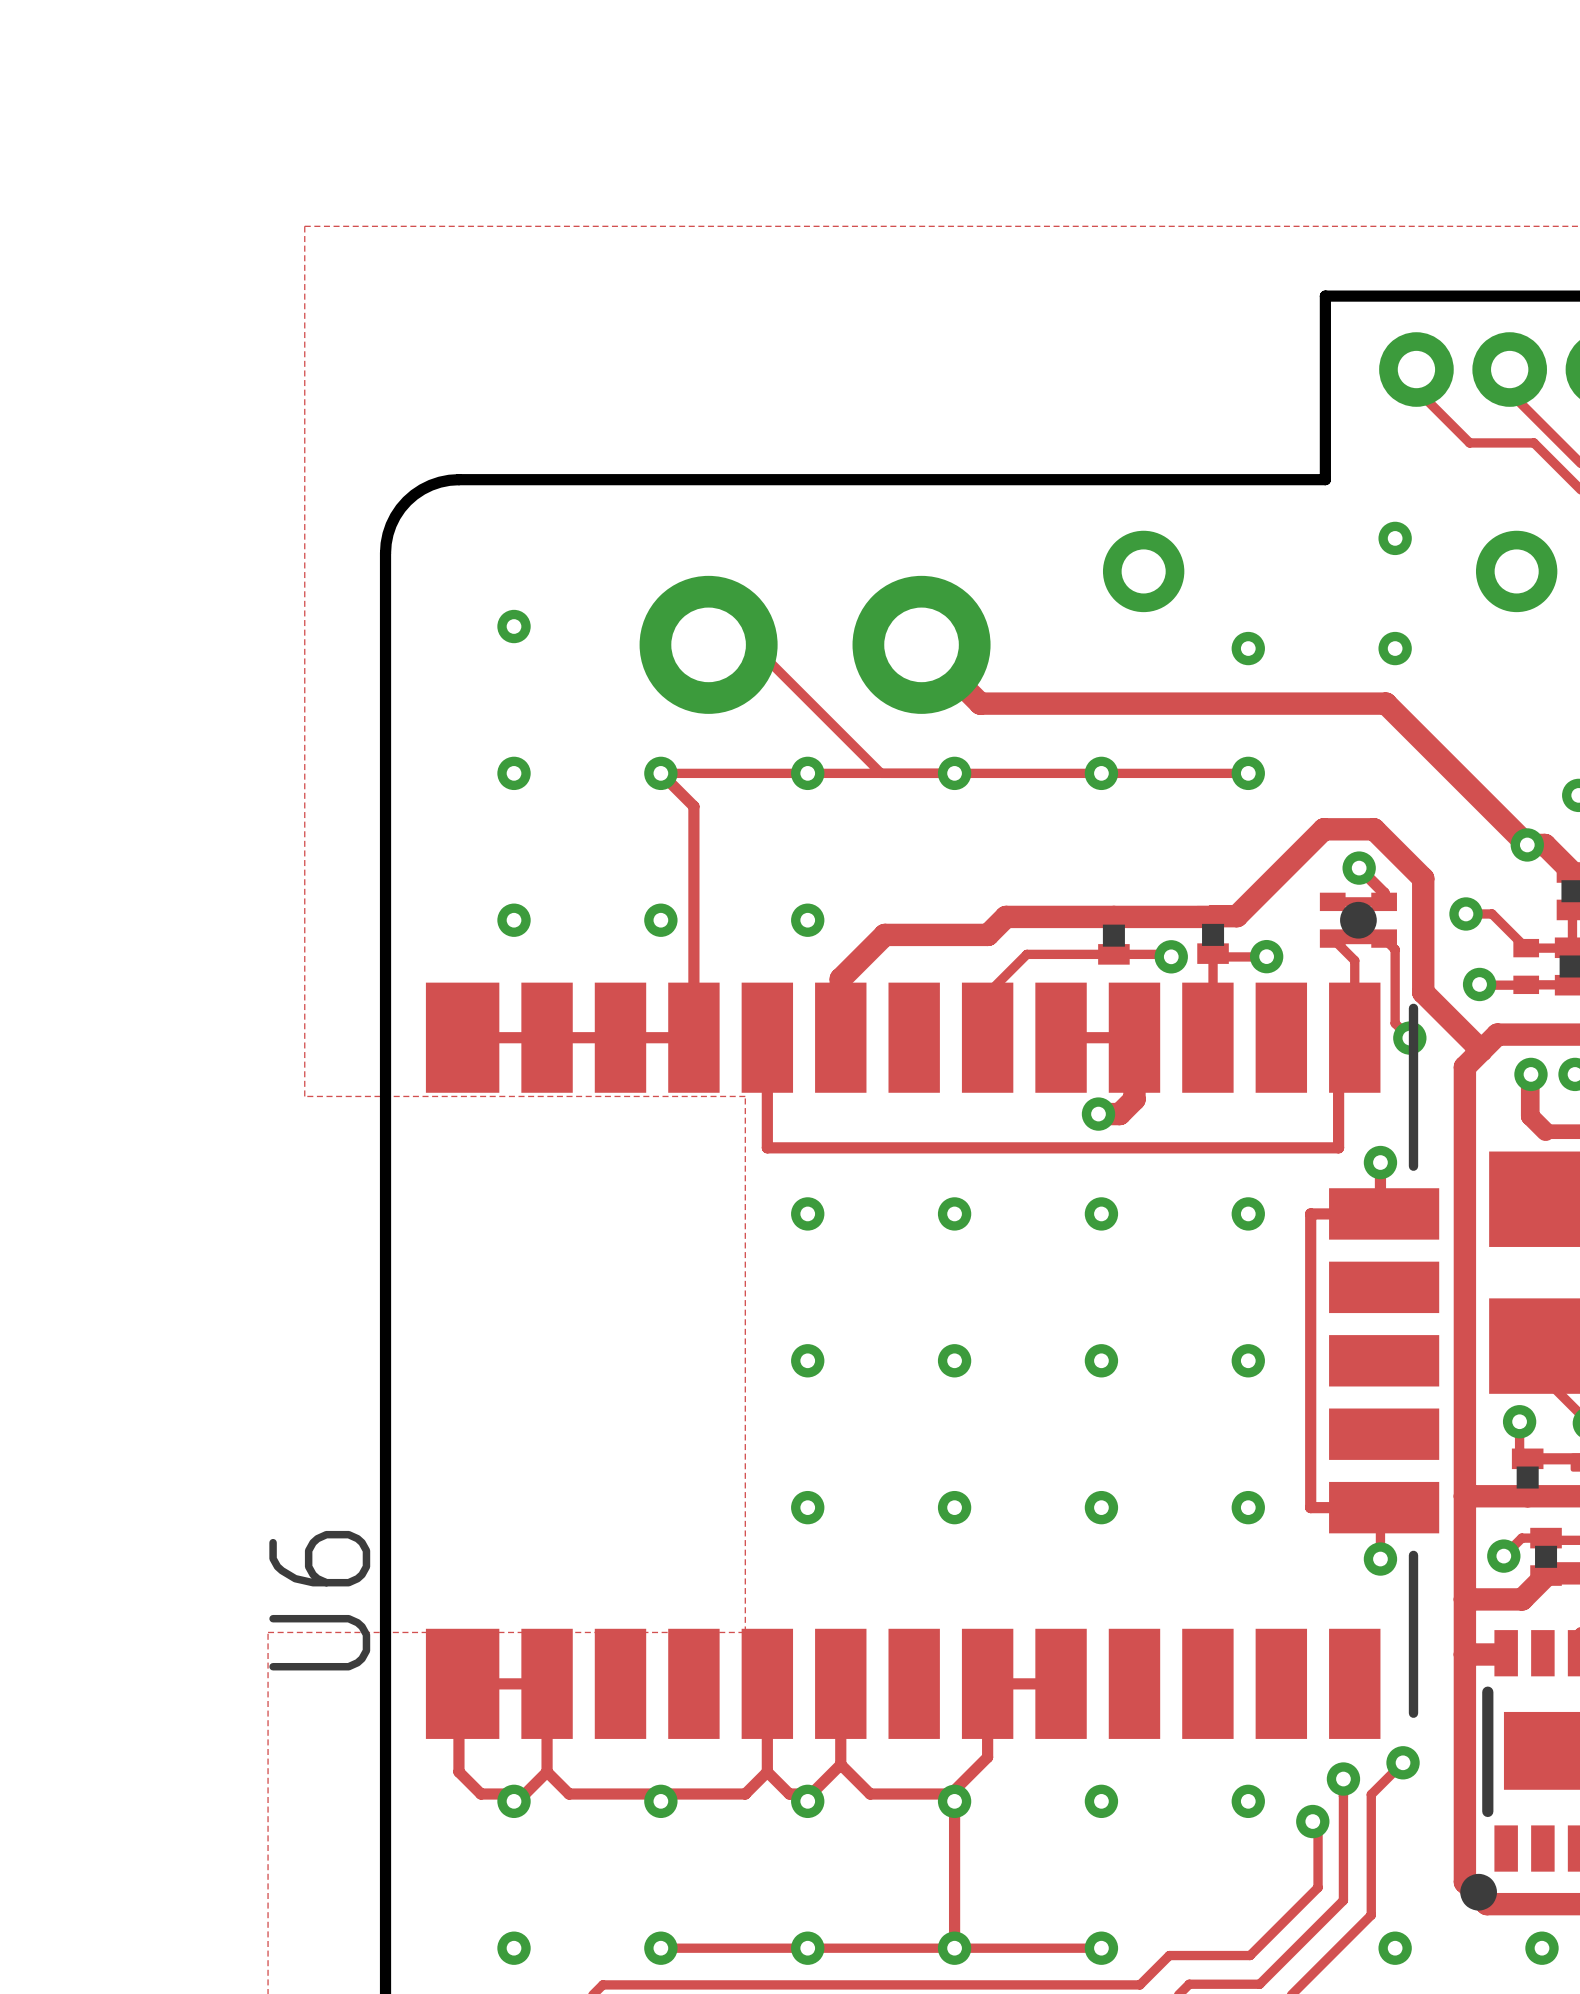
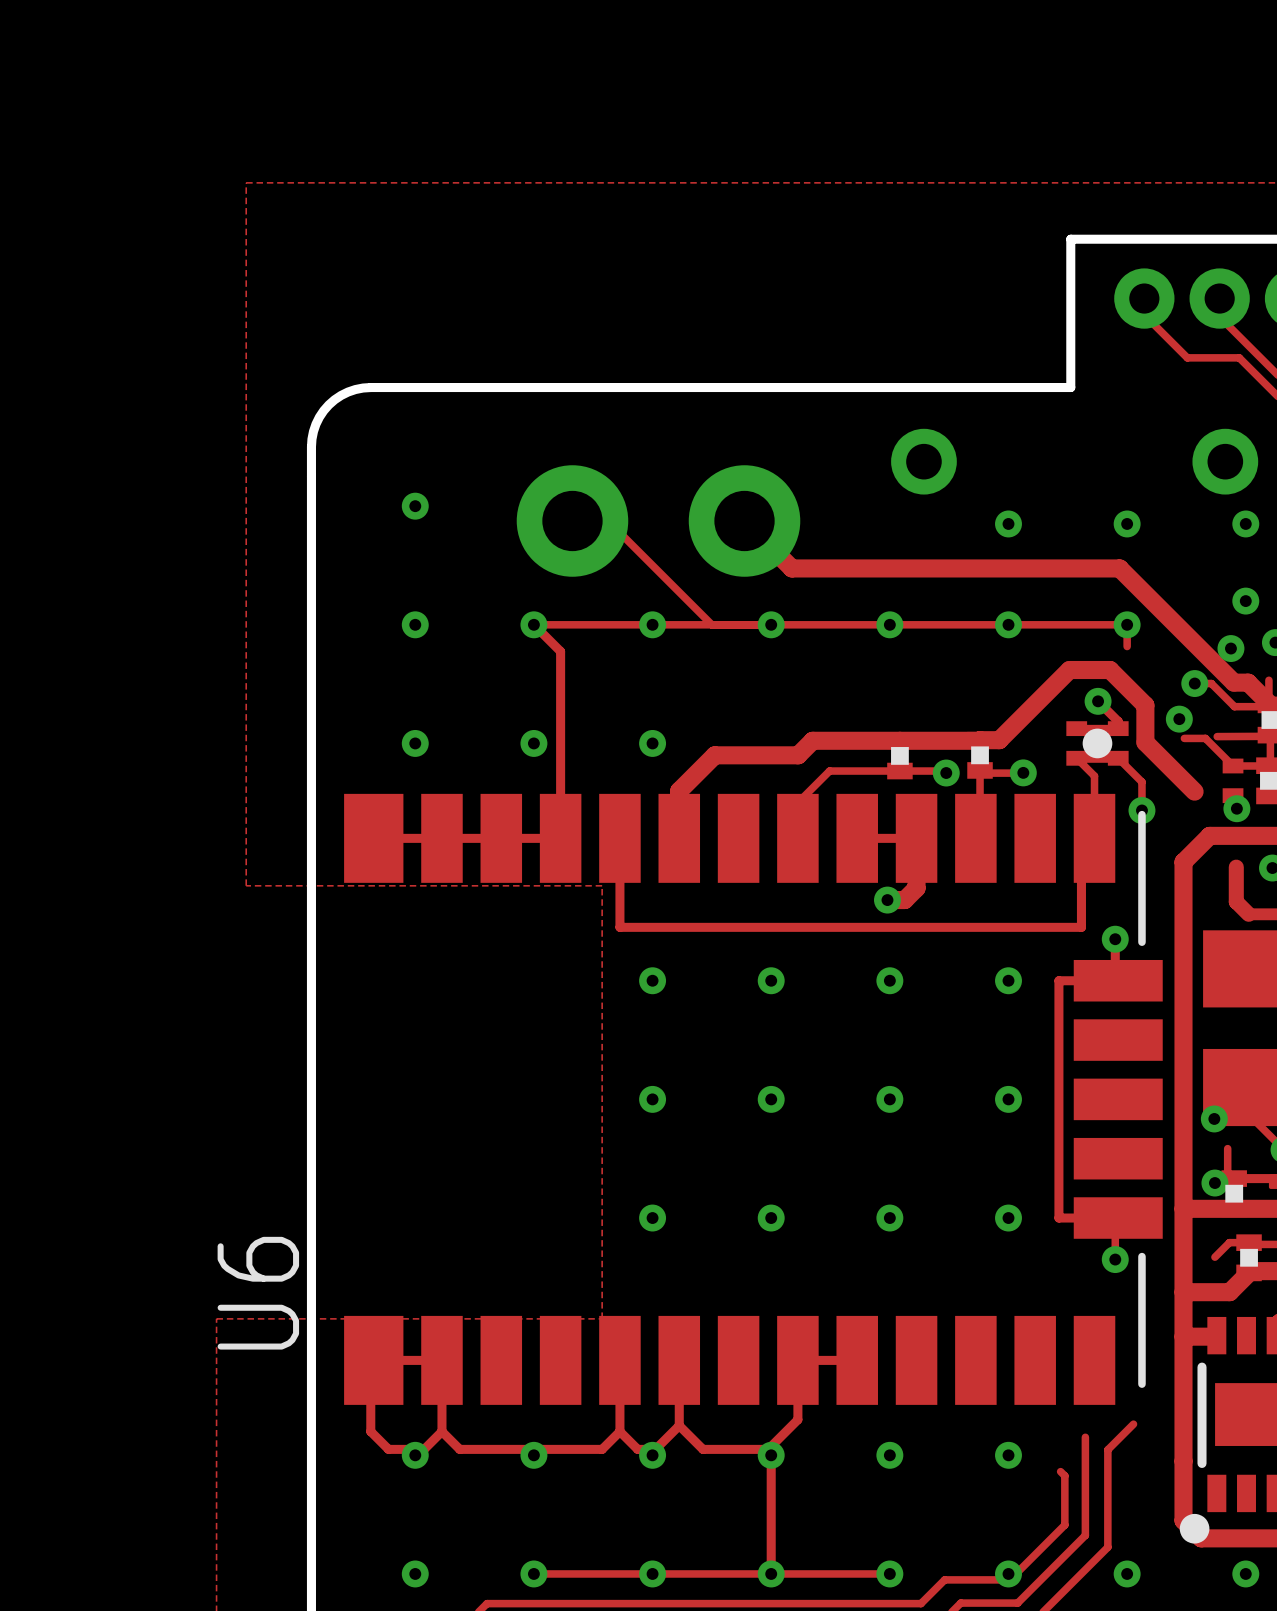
via: (1395, 538) -> none
via: none -> (1245, 523)
via: none -> (1245, 601)
track: none -> (1008, 624) (1127, 624) (1127, 646)
via: none -> (1127, 624)
via: none -> (1230, 648)
track: none -> (1268, 680) (1268, 706) (1234, 706) (1211, 683) (1194, 683)
via: (1527, 844) -> none
via: none -> (1194, 683)
track: (1417, 873) (1423, 878) (1423, 992) (1481, 1050) -> (1145, 705) (1145, 742) (1194, 791)
track: none -> (1217, 736) (1268, 736)
via position: (1466, 913) -> (1179, 719)
track: (1395, 949) (1395, 1023) (1409, 1038) -> (1127, 767) (1141, 782) (1141, 810)
via: (1479, 984) -> none
via: none -> (1236, 808)
via: none -> (1141, 810)
via: (1409, 1038) -> none
via: (1530, 1074) -> none
via: none -> (1214, 1118)
via: (1519, 1421) -> none
via: none -> (1214, 1183)
via: (1503, 1556) -> none
via: (1403, 1762) -> none
via: (1343, 1779) -> none
via: (1312, 1821) -> none
via: none -> (1008, 1573)

